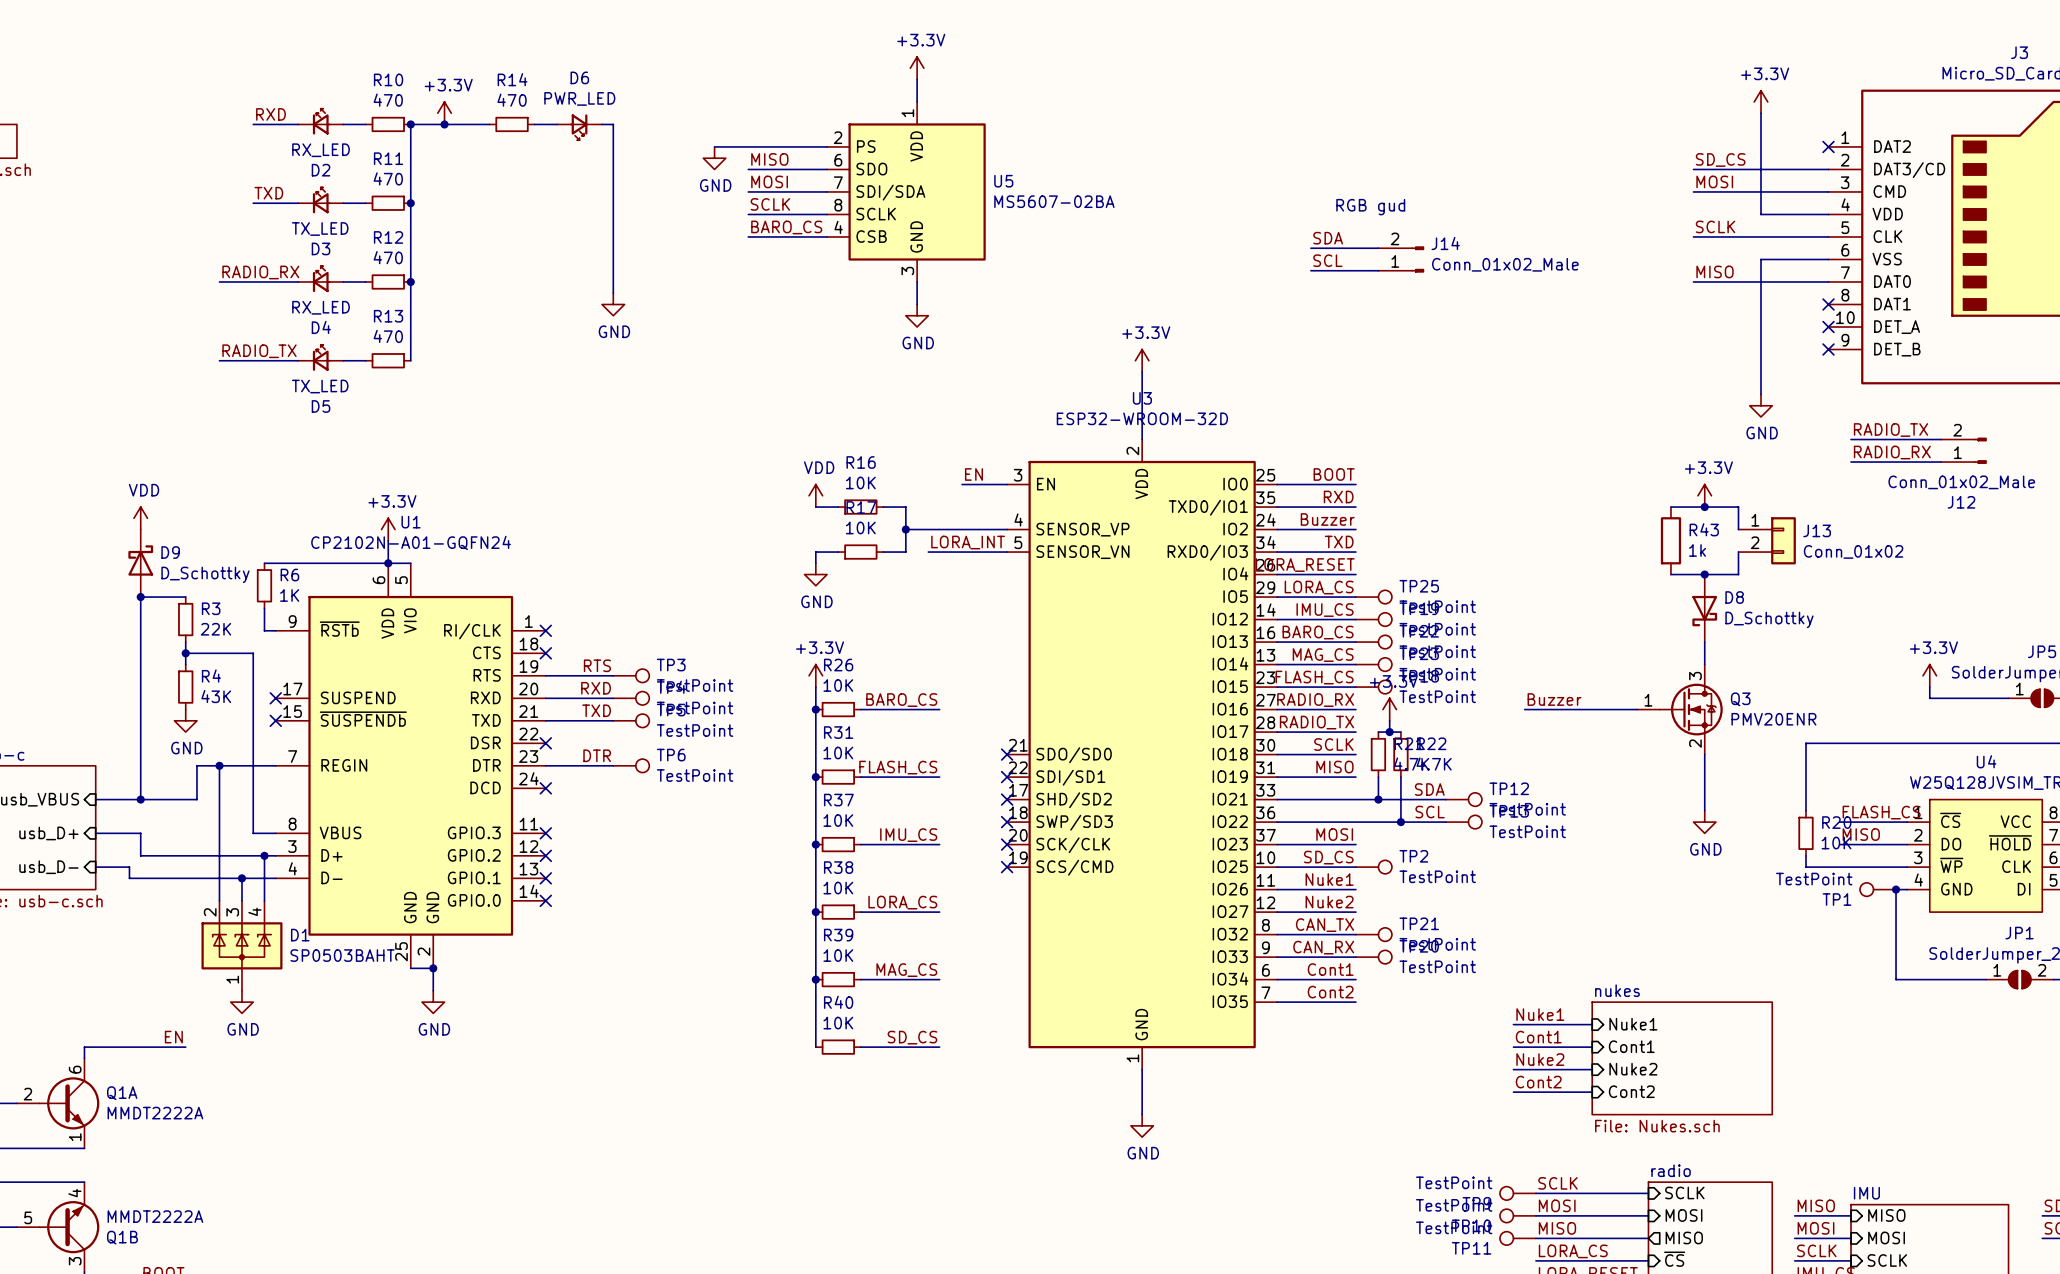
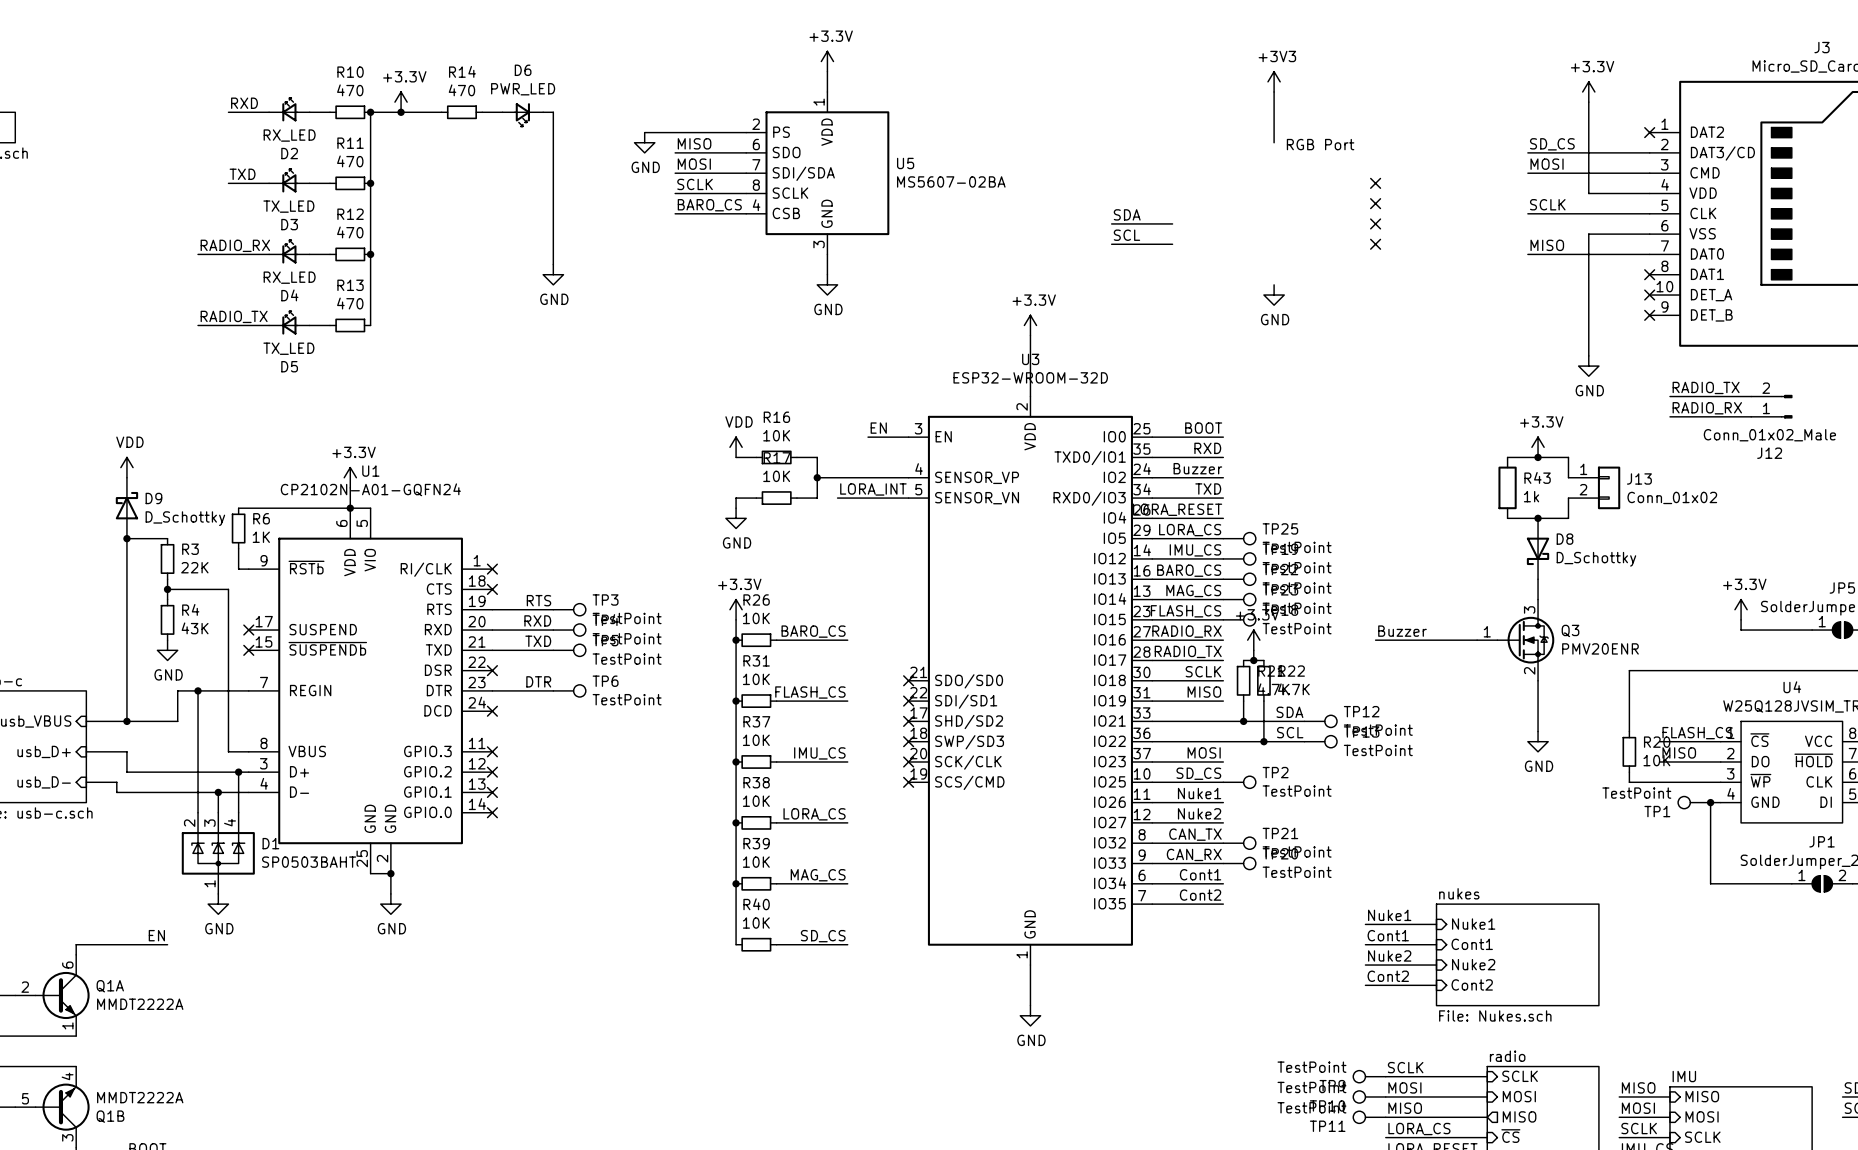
power symbol: none -> +3V3 (1274, 81)
wire: none -> (1274, 91) (1274, 142)
text: none -> RGB Port (1320, 144)
no-connect mark: none -> (1375, 183)
text: RGB gud (1370, 207) -> none
no-connect mark: none -> (1375, 203)
label position: SDA (1328, 238) -> SDA (1127, 214)
wire: (1310, 248) (1378, 248) -> (1111, 223) (1172, 223)
no-connect mark: none -> (1375, 223)
J14: Conn_01x02_Male (1401, 259) -> none
label position: SCL (1327, 260) -> SCL (1126, 235)
wire: (1310, 270) (1378, 270) -> (1111, 244) (1172, 244)
no-connect mark: none -> (1375, 244)
power symbol: none -> GND (1274, 295)

